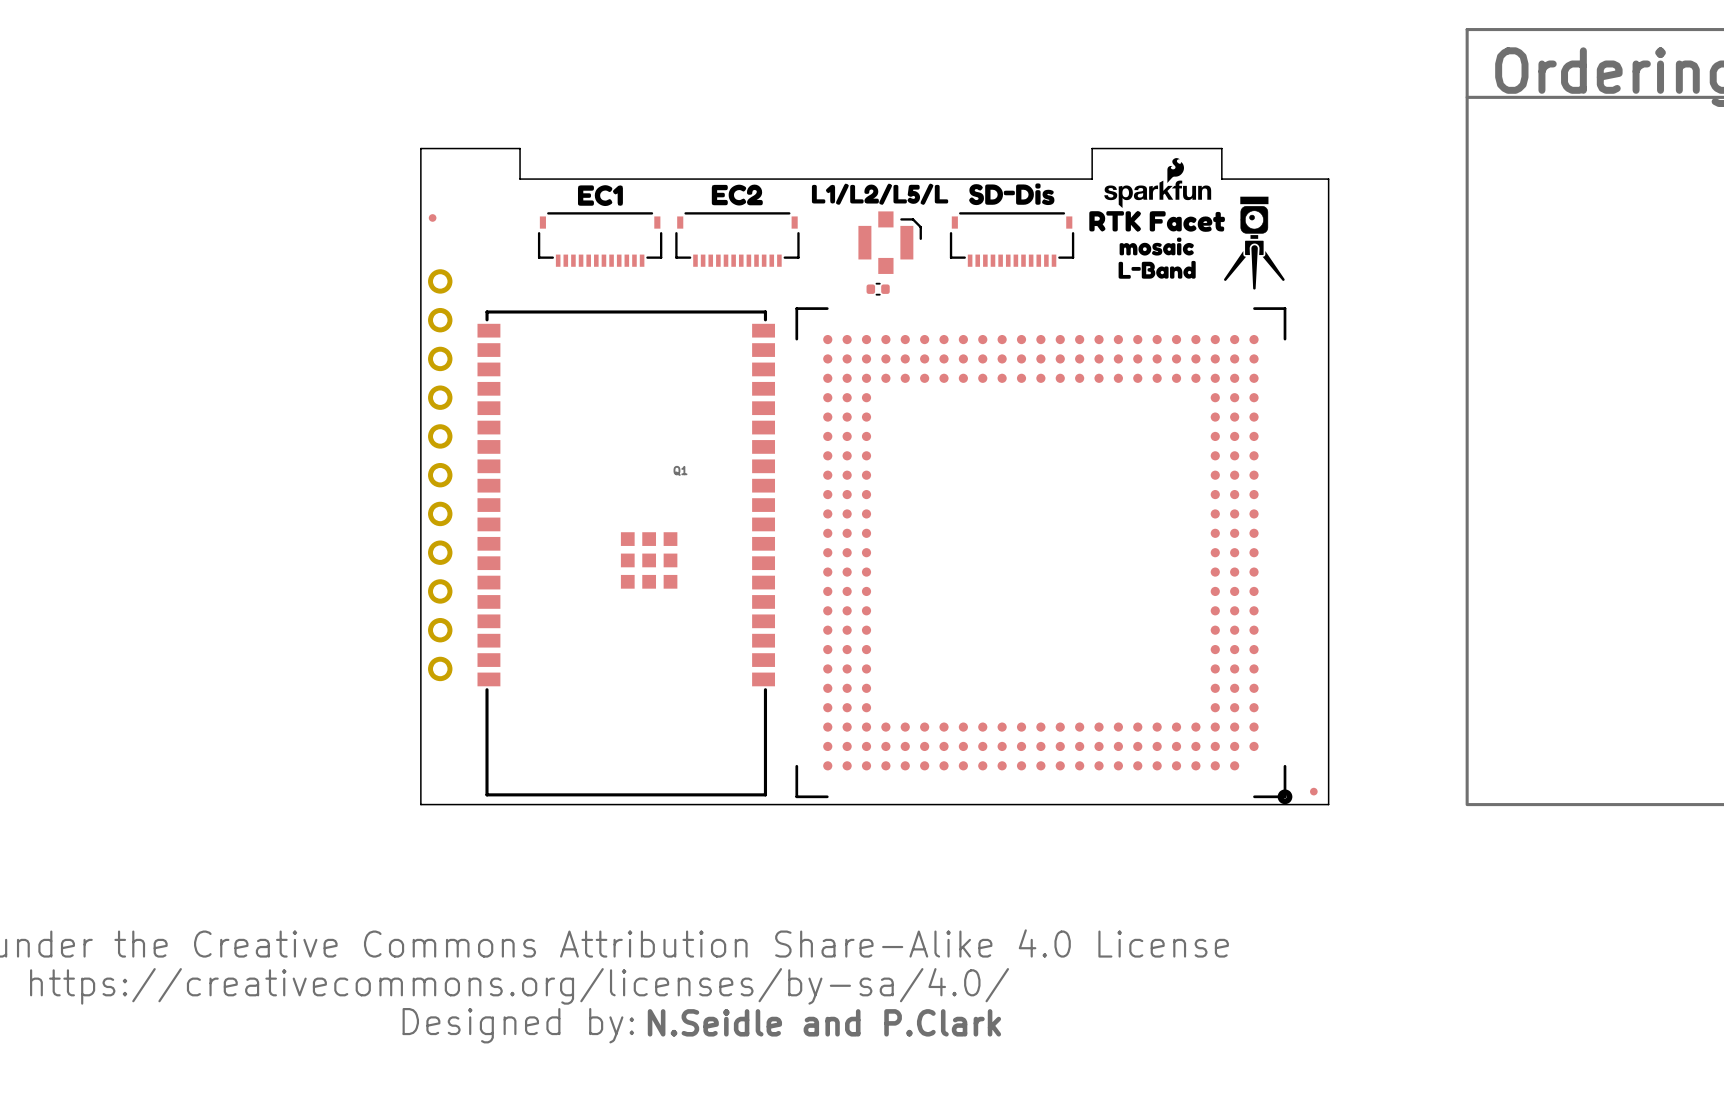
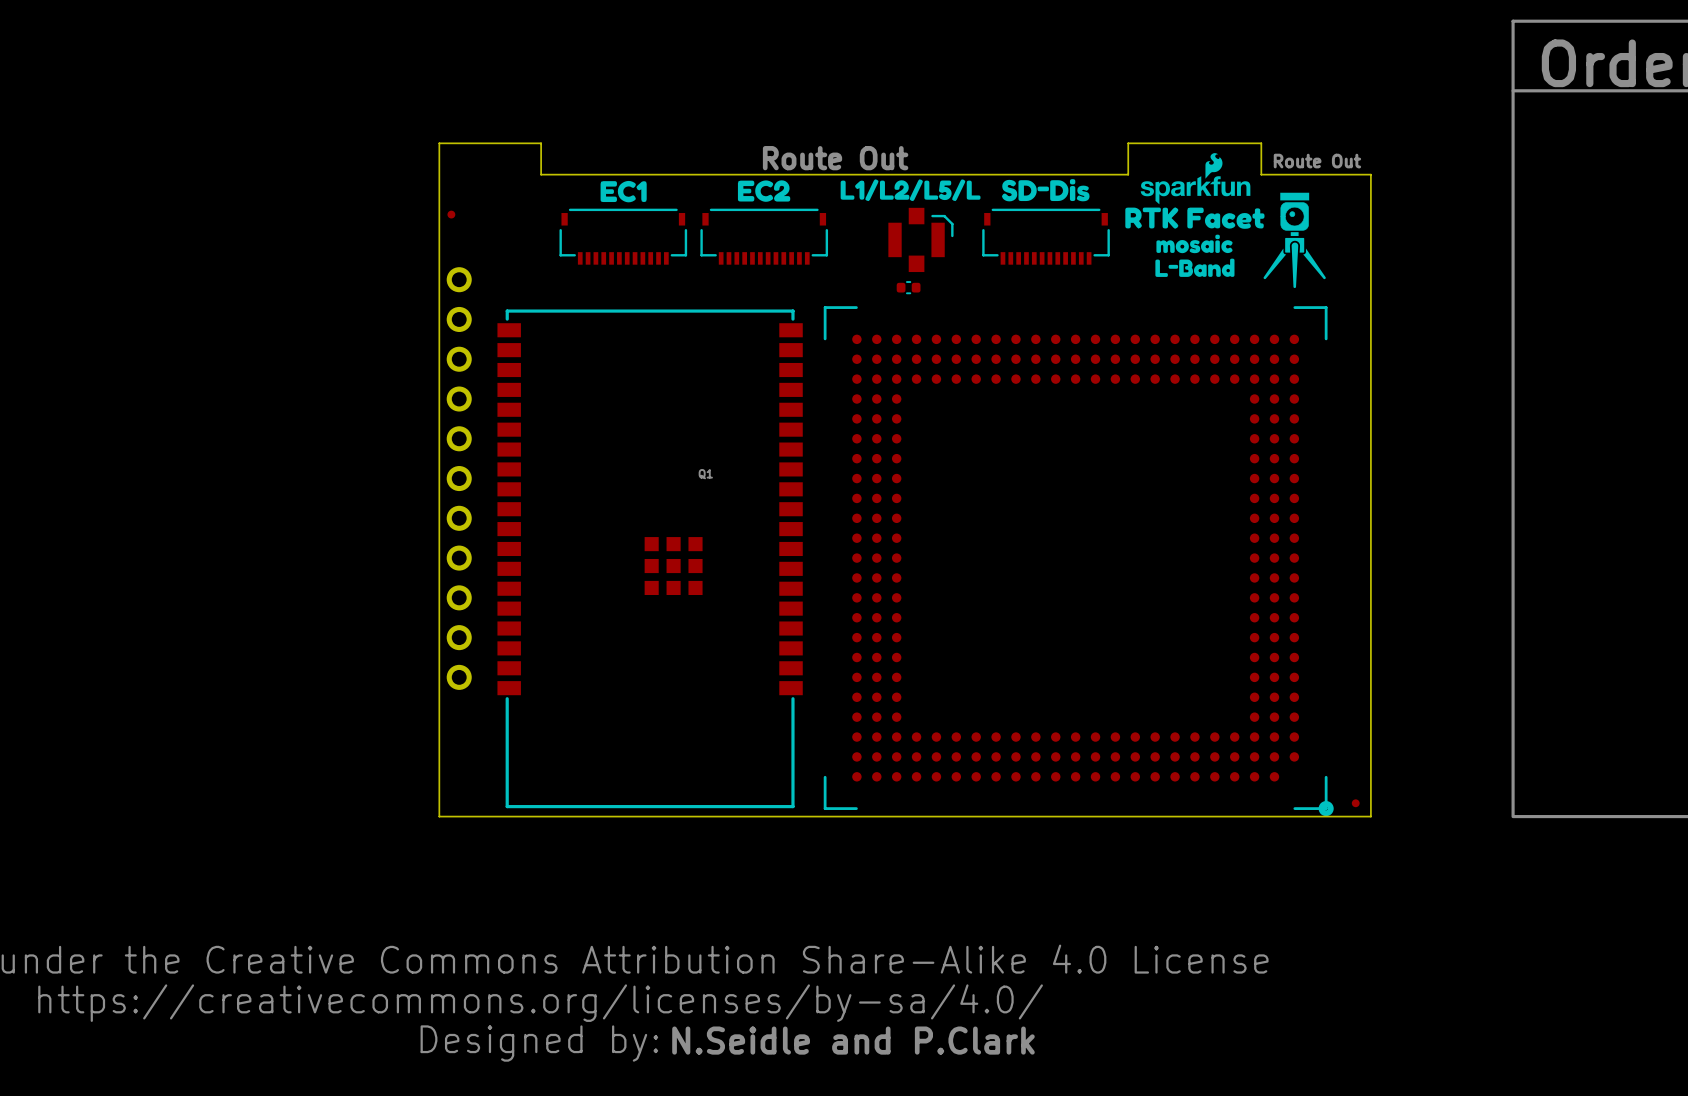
text: none -> Route Out (835, 158)
text: none -> Route Out (1317, 161)

